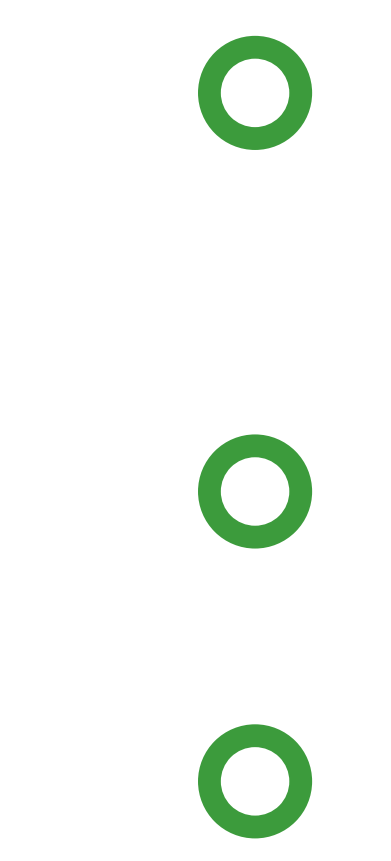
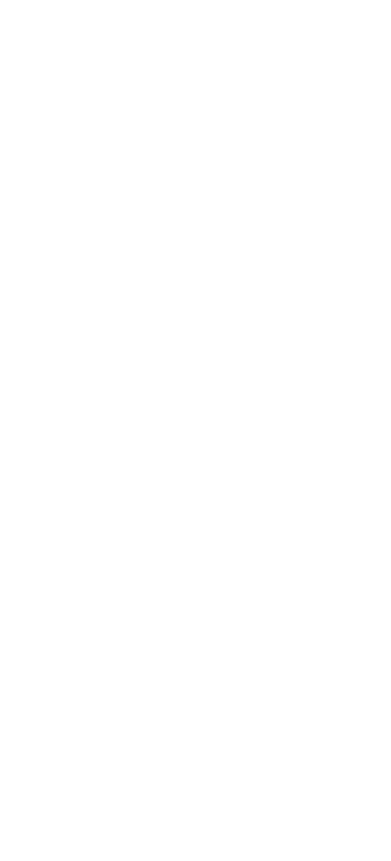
part: (255, 92) -> none
part: (255, 491) -> none
part: (255, 781) -> none

